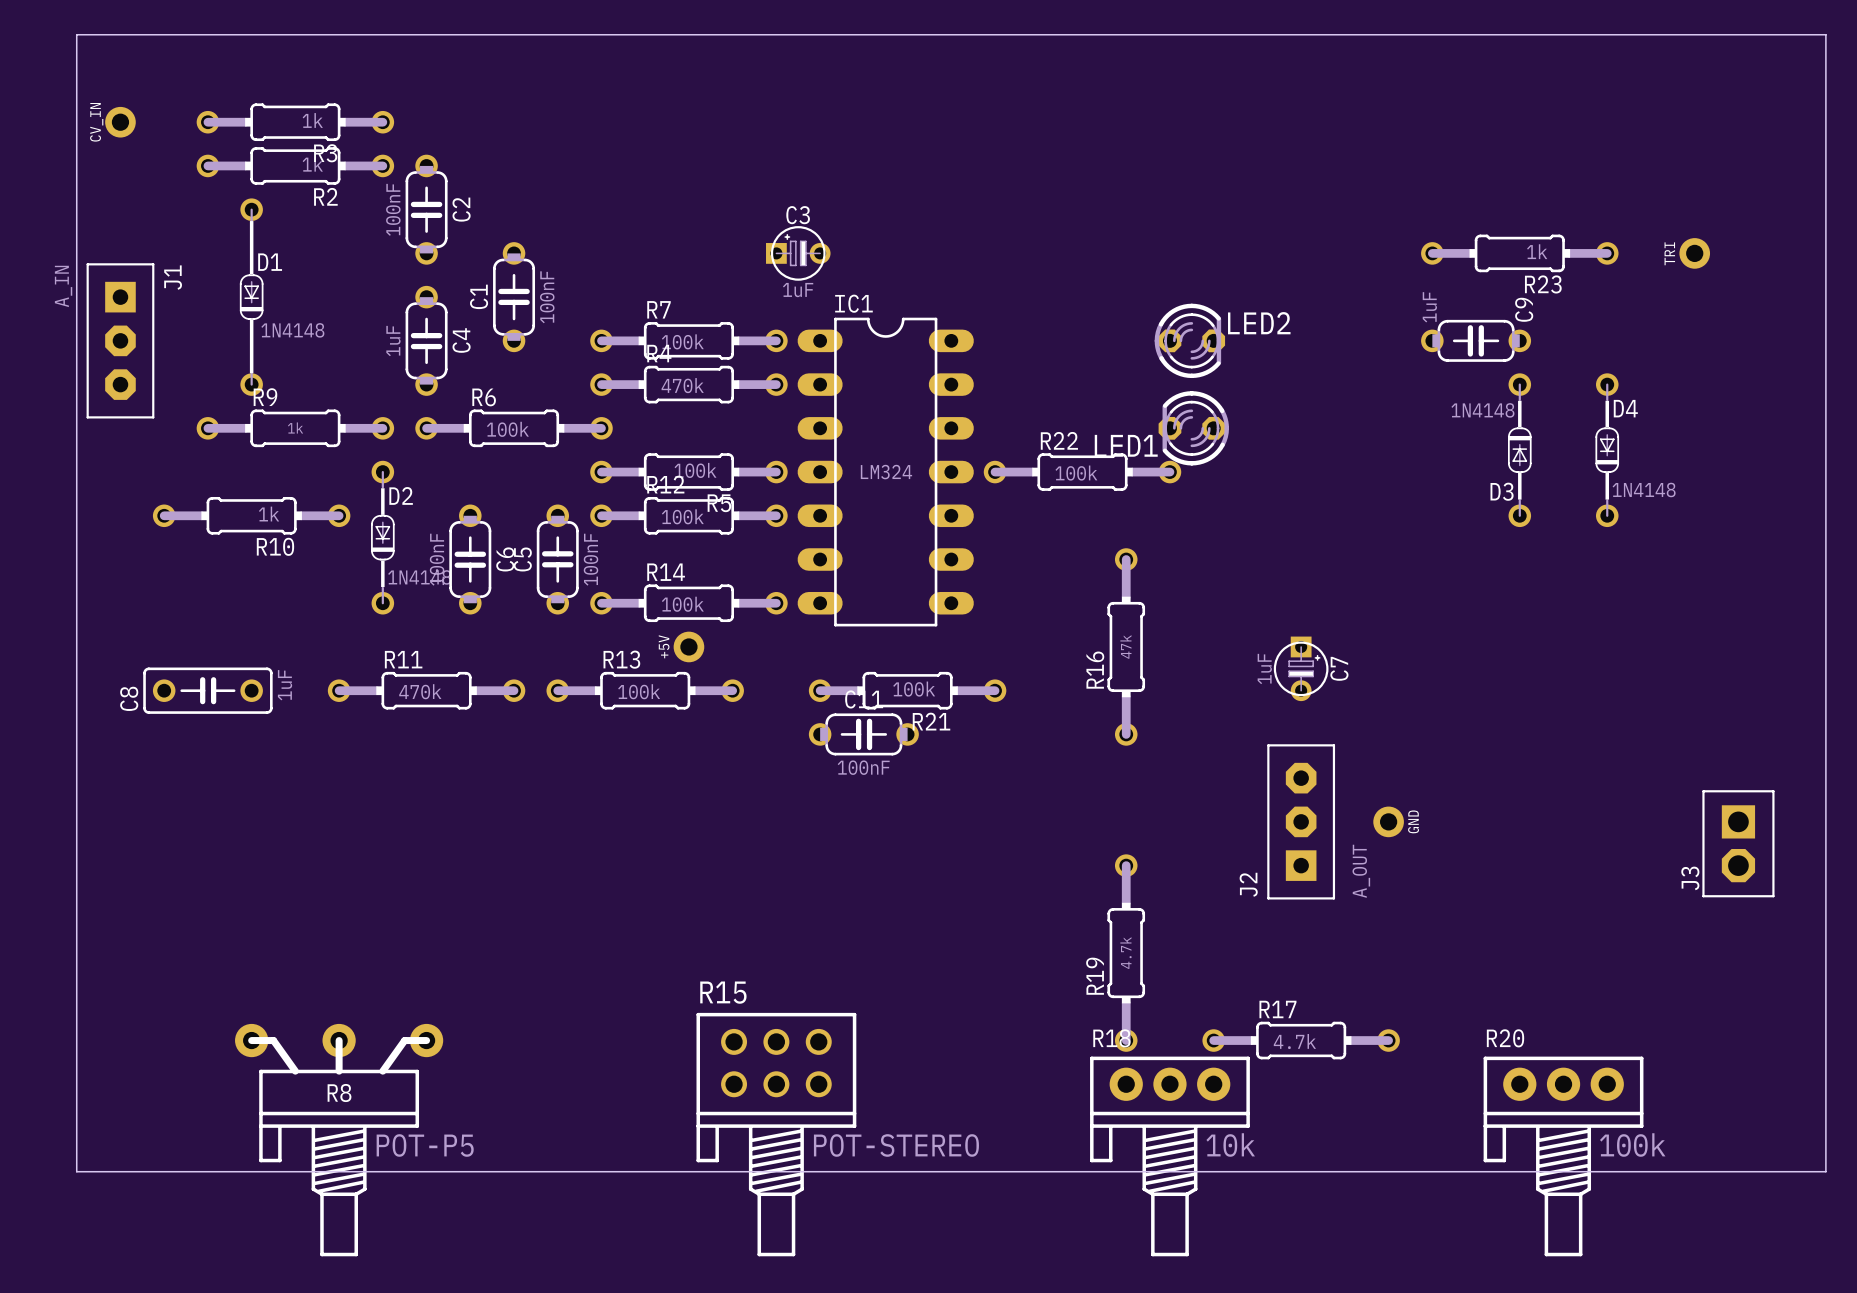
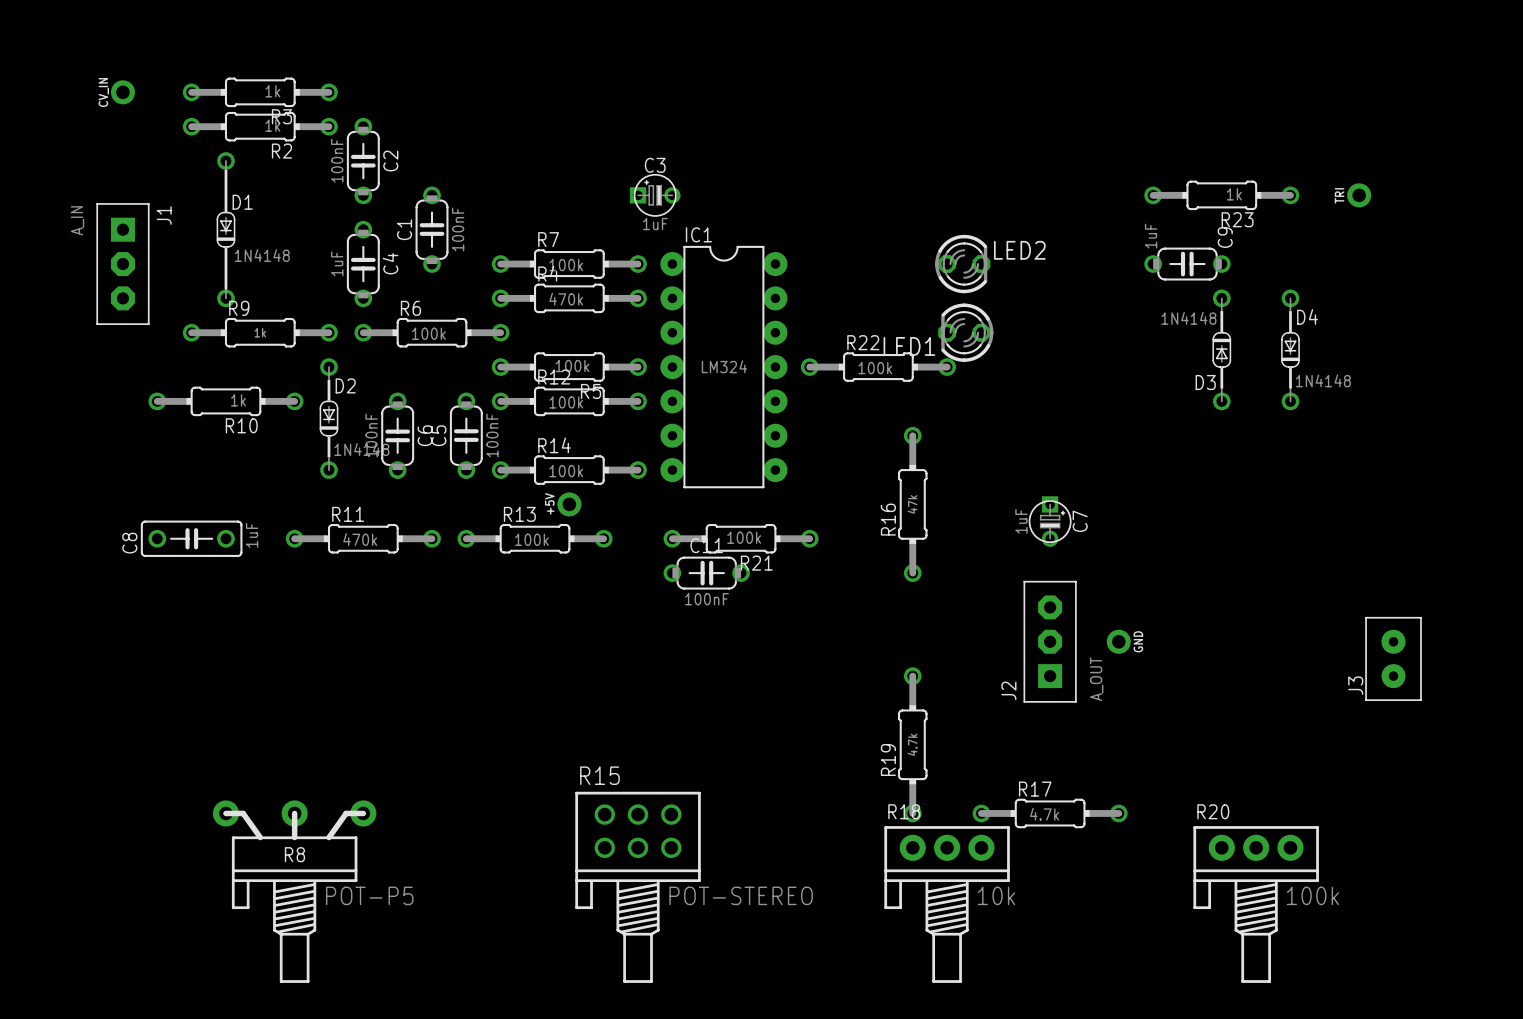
board edge: (76, 34) (1825, 34) (1825, 1171) (76, 1171) (76, 34) -> none
IC1 footprint: [797, 317, 974, 627] -> [660, 245, 788, 489]
J3 footprint: [1702, 790, 1775, 898] -> [1365, 616, 1422, 702]

